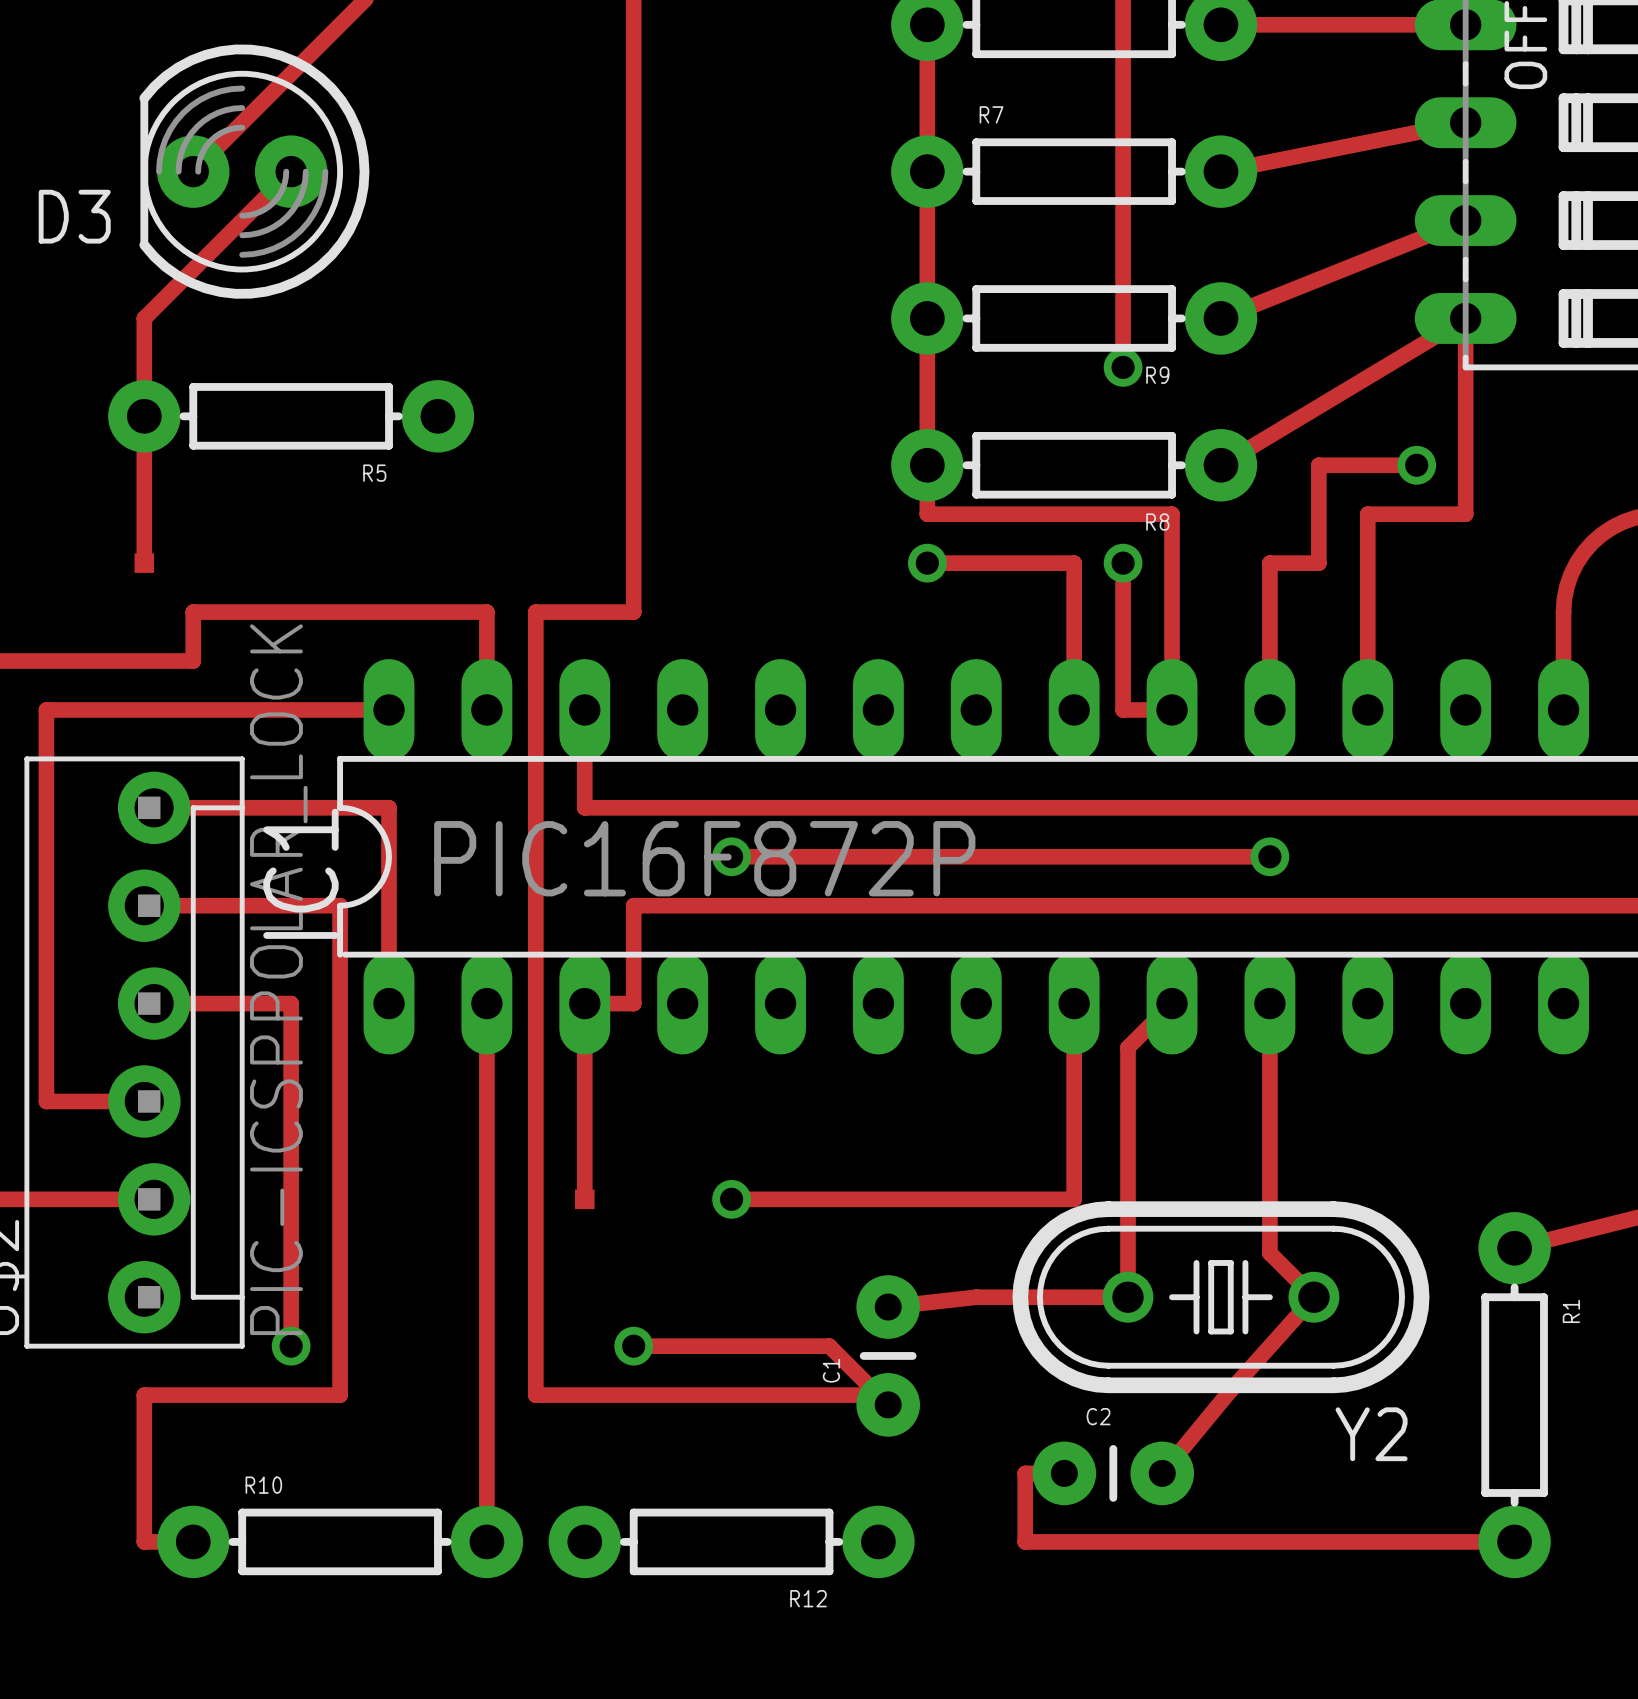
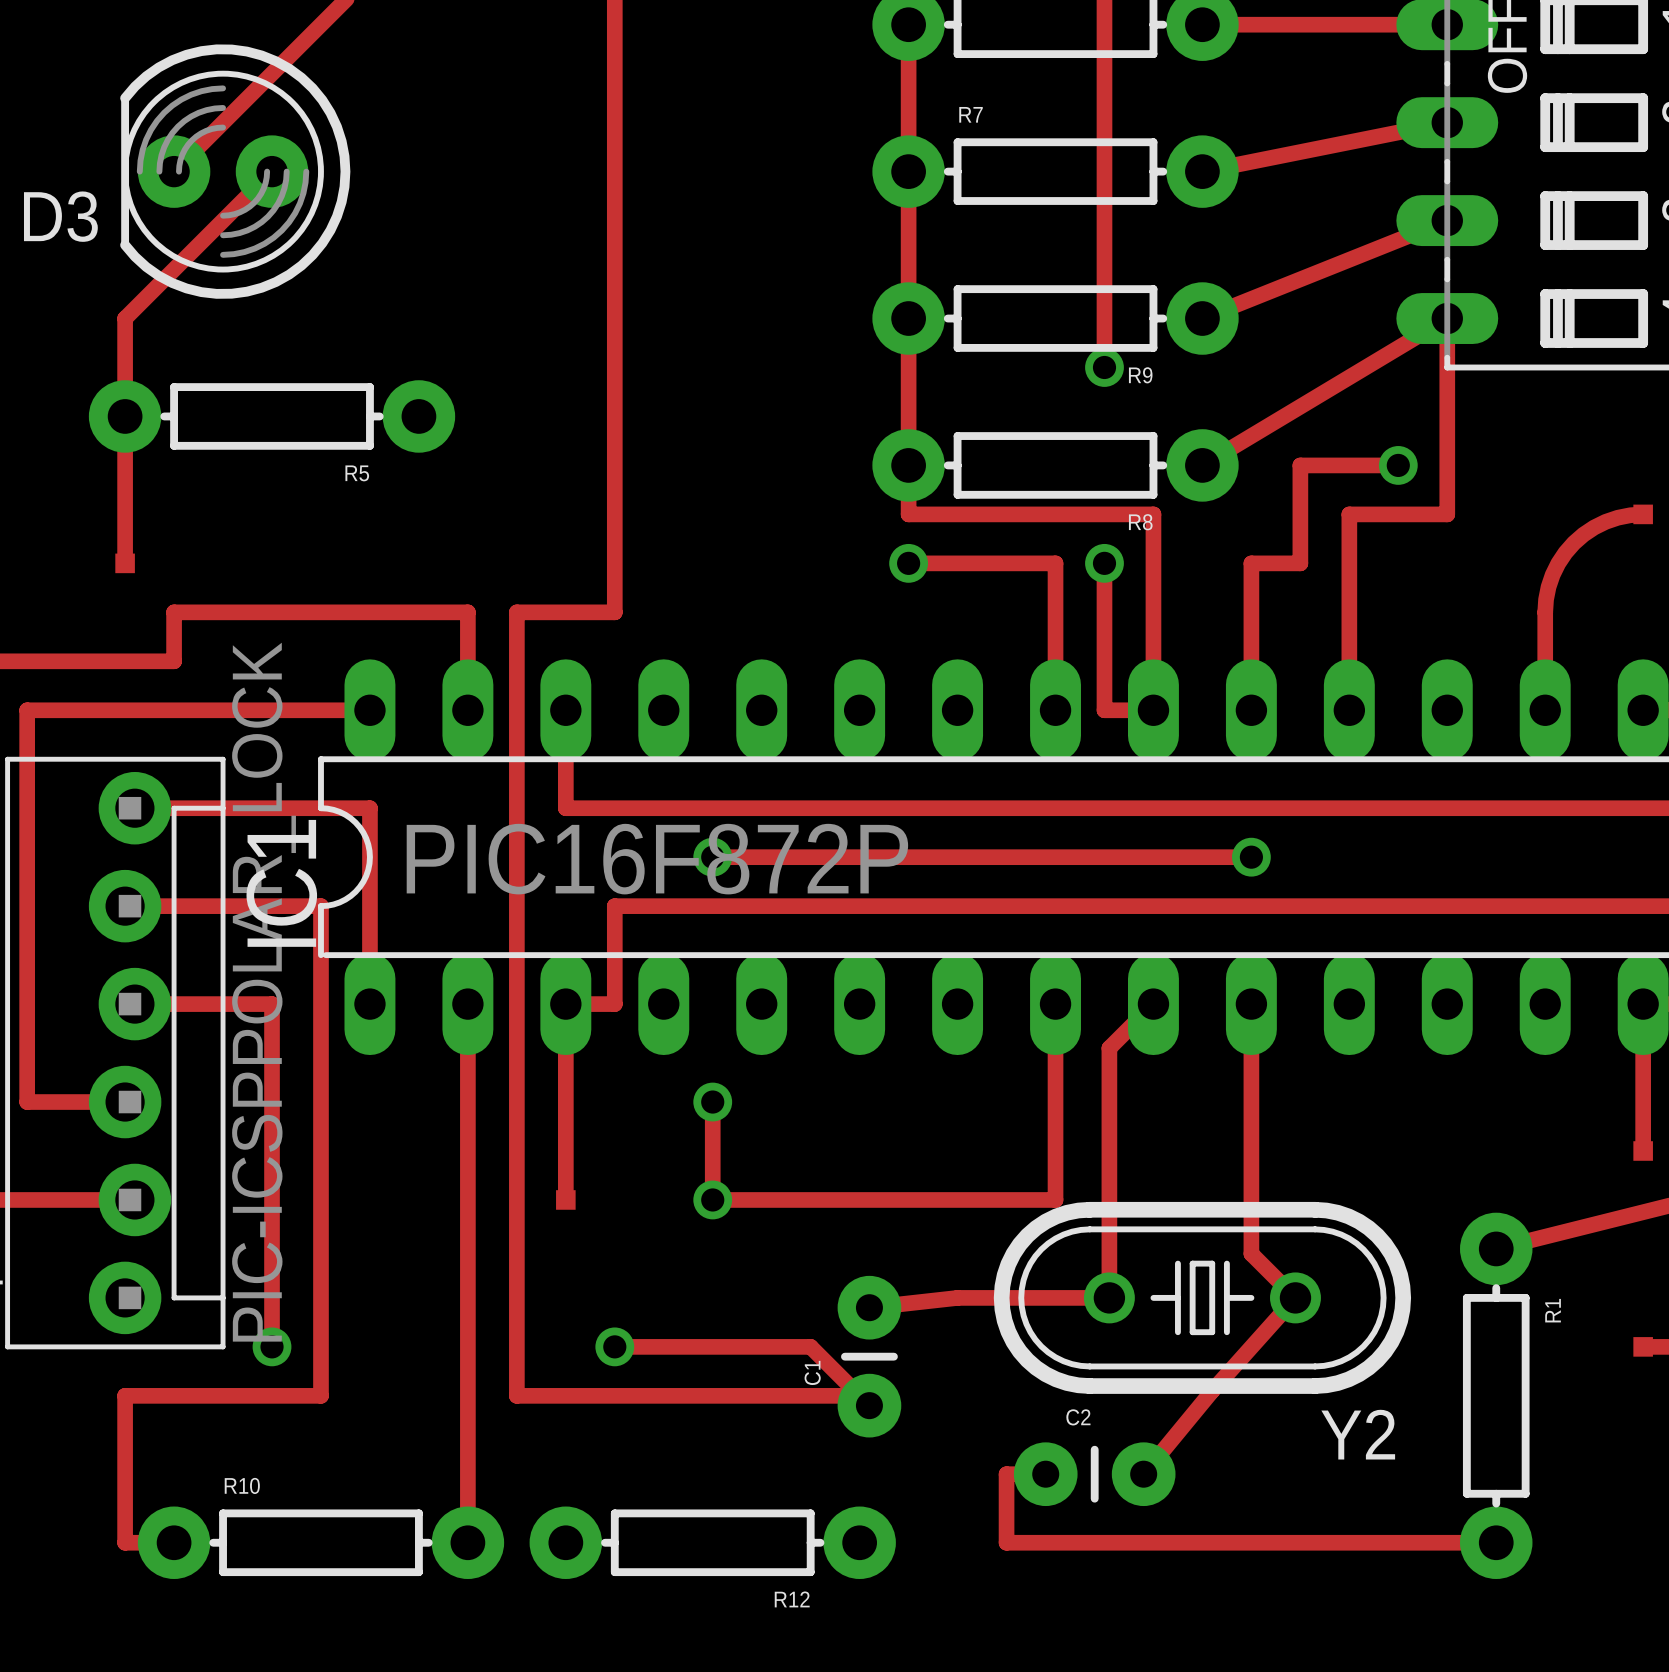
track: none -> (712, 1102) (712, 1199)
via: none -> (712, 1102)

